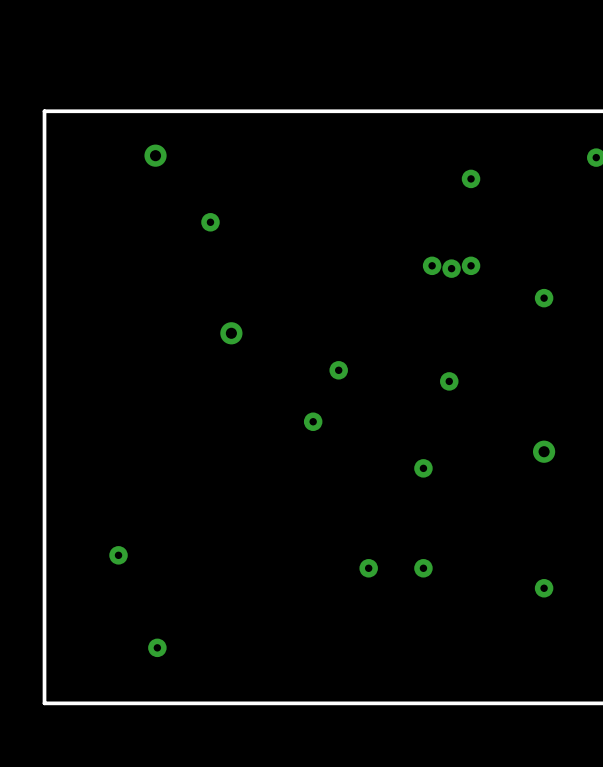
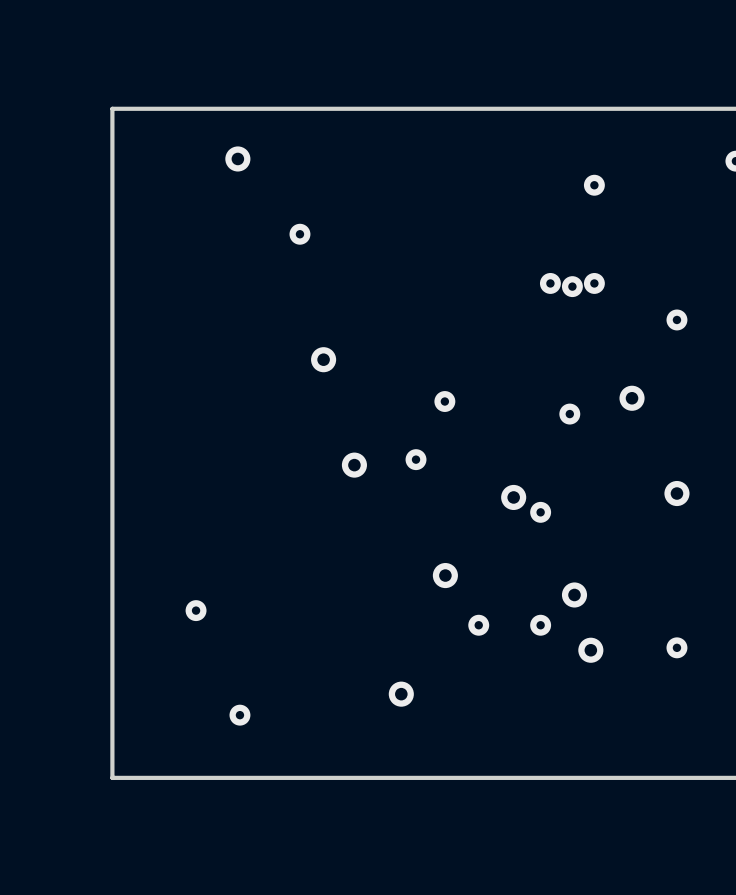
via: none -> (632, 398)
via: none -> (354, 465)
via: none -> (513, 497)
via: none -> (445, 575)
via: none -> (574, 594)
via: none -> (590, 650)
via: none -> (401, 694)

